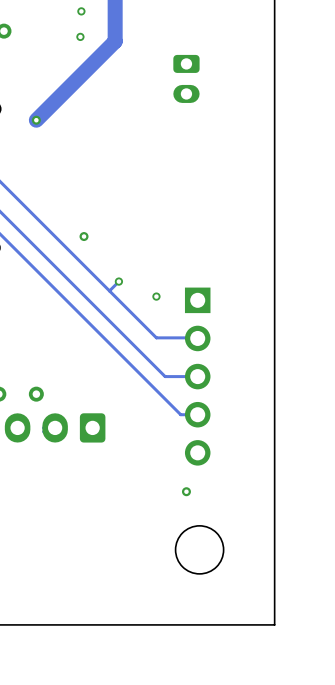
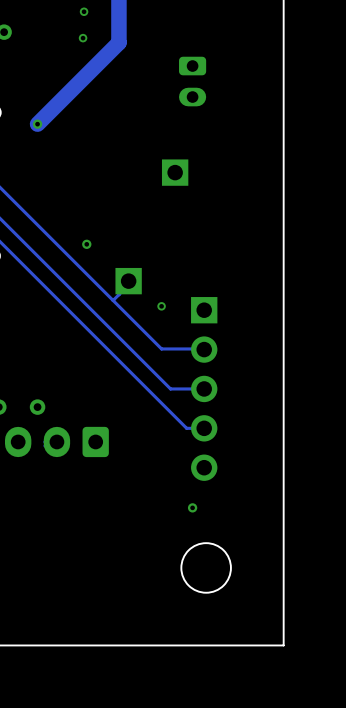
part: none -> (175, 172)
part: none -> (128, 281)
via: (118, 281) -> none

